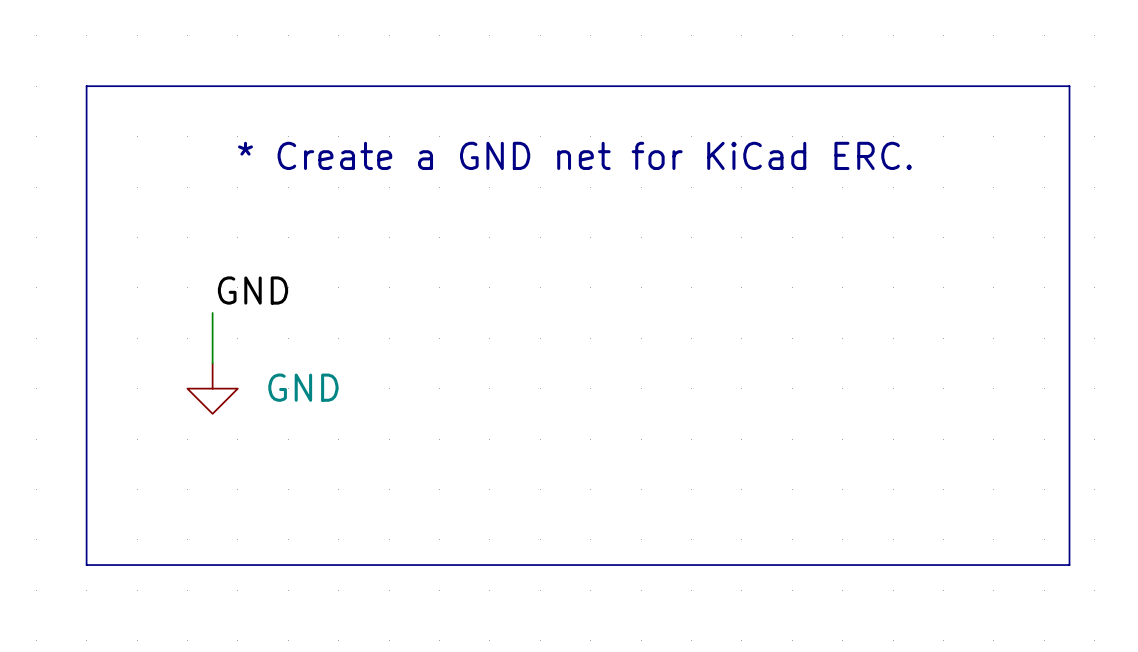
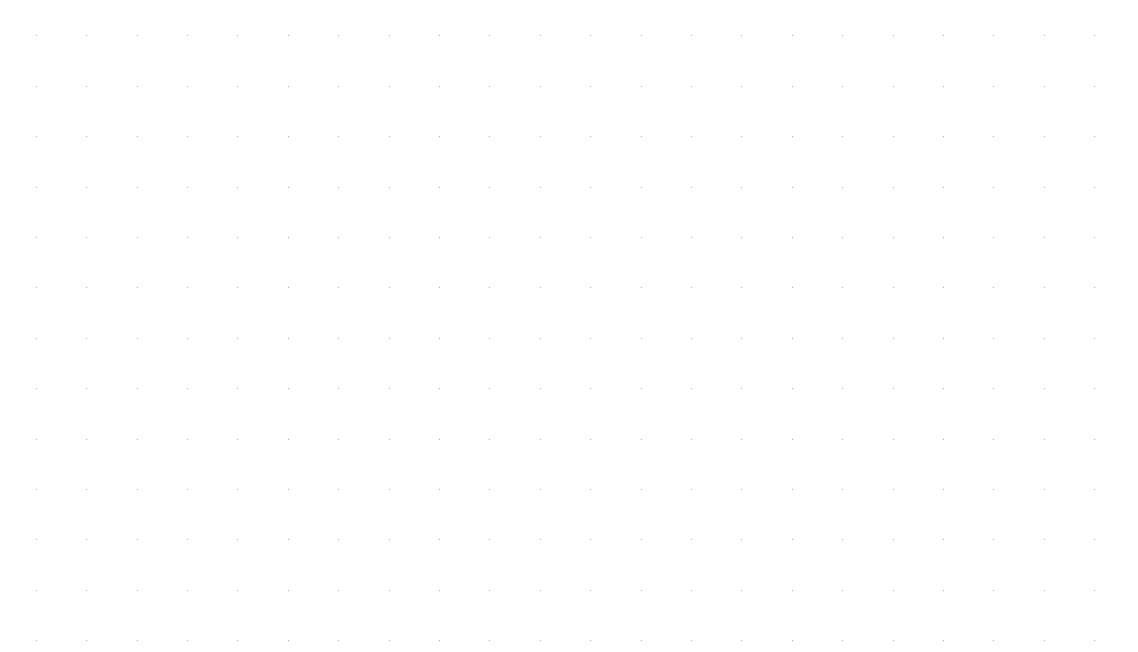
bus: (86, 86) (1069, 86) (1069, 565) (86, 565) (86, 86) -> none
text: * Create a GND net for KiCad ERC. (574, 155) -> none
label: GND (253, 290) -> none
wire: (212, 313) (212, 363) -> none
power symbol: GND (212, 388) -> none

